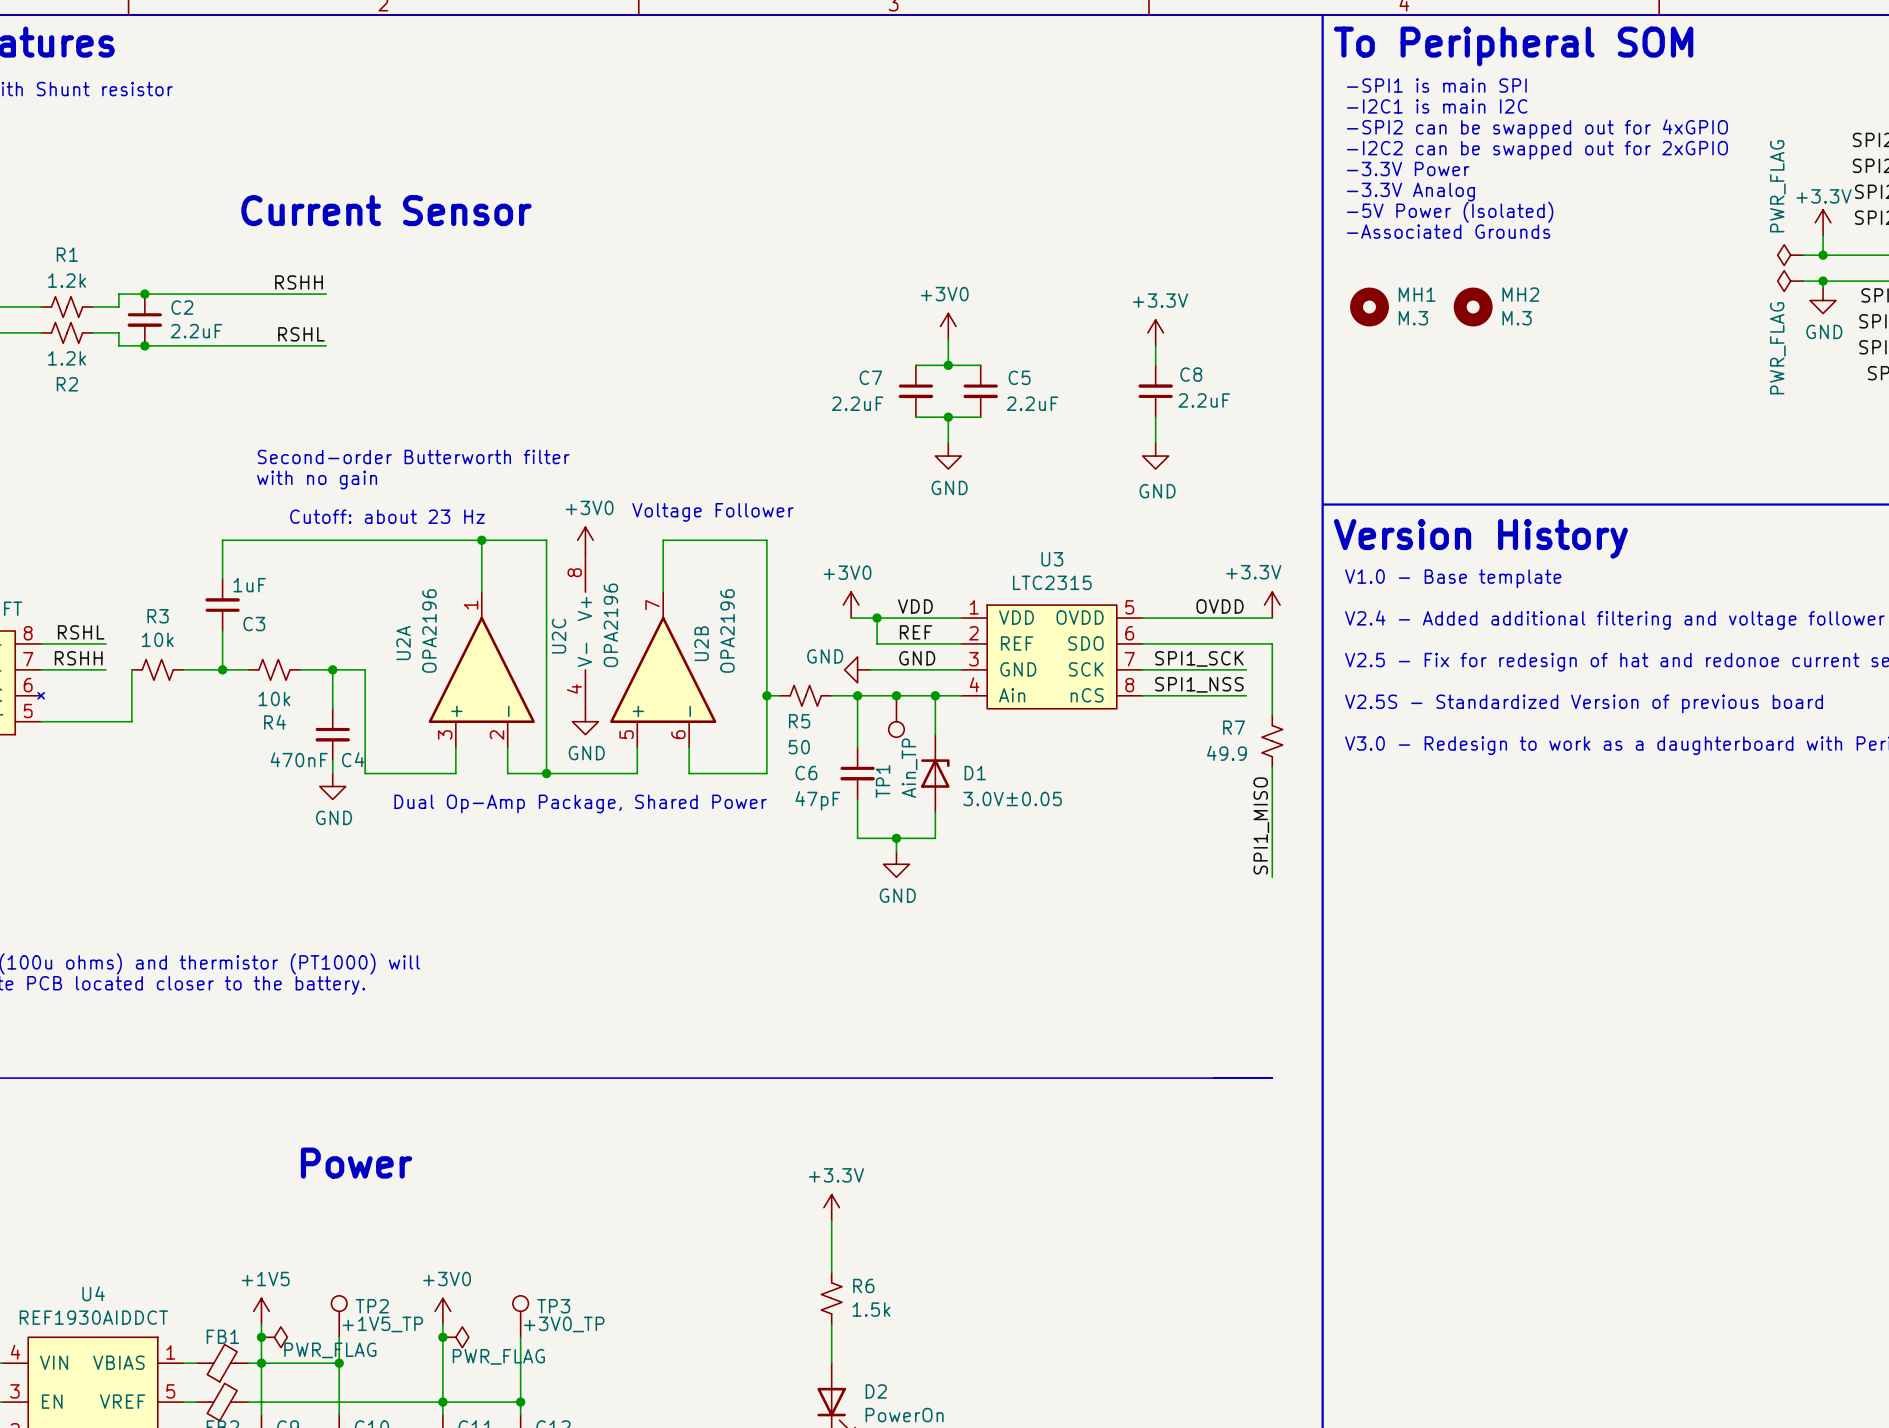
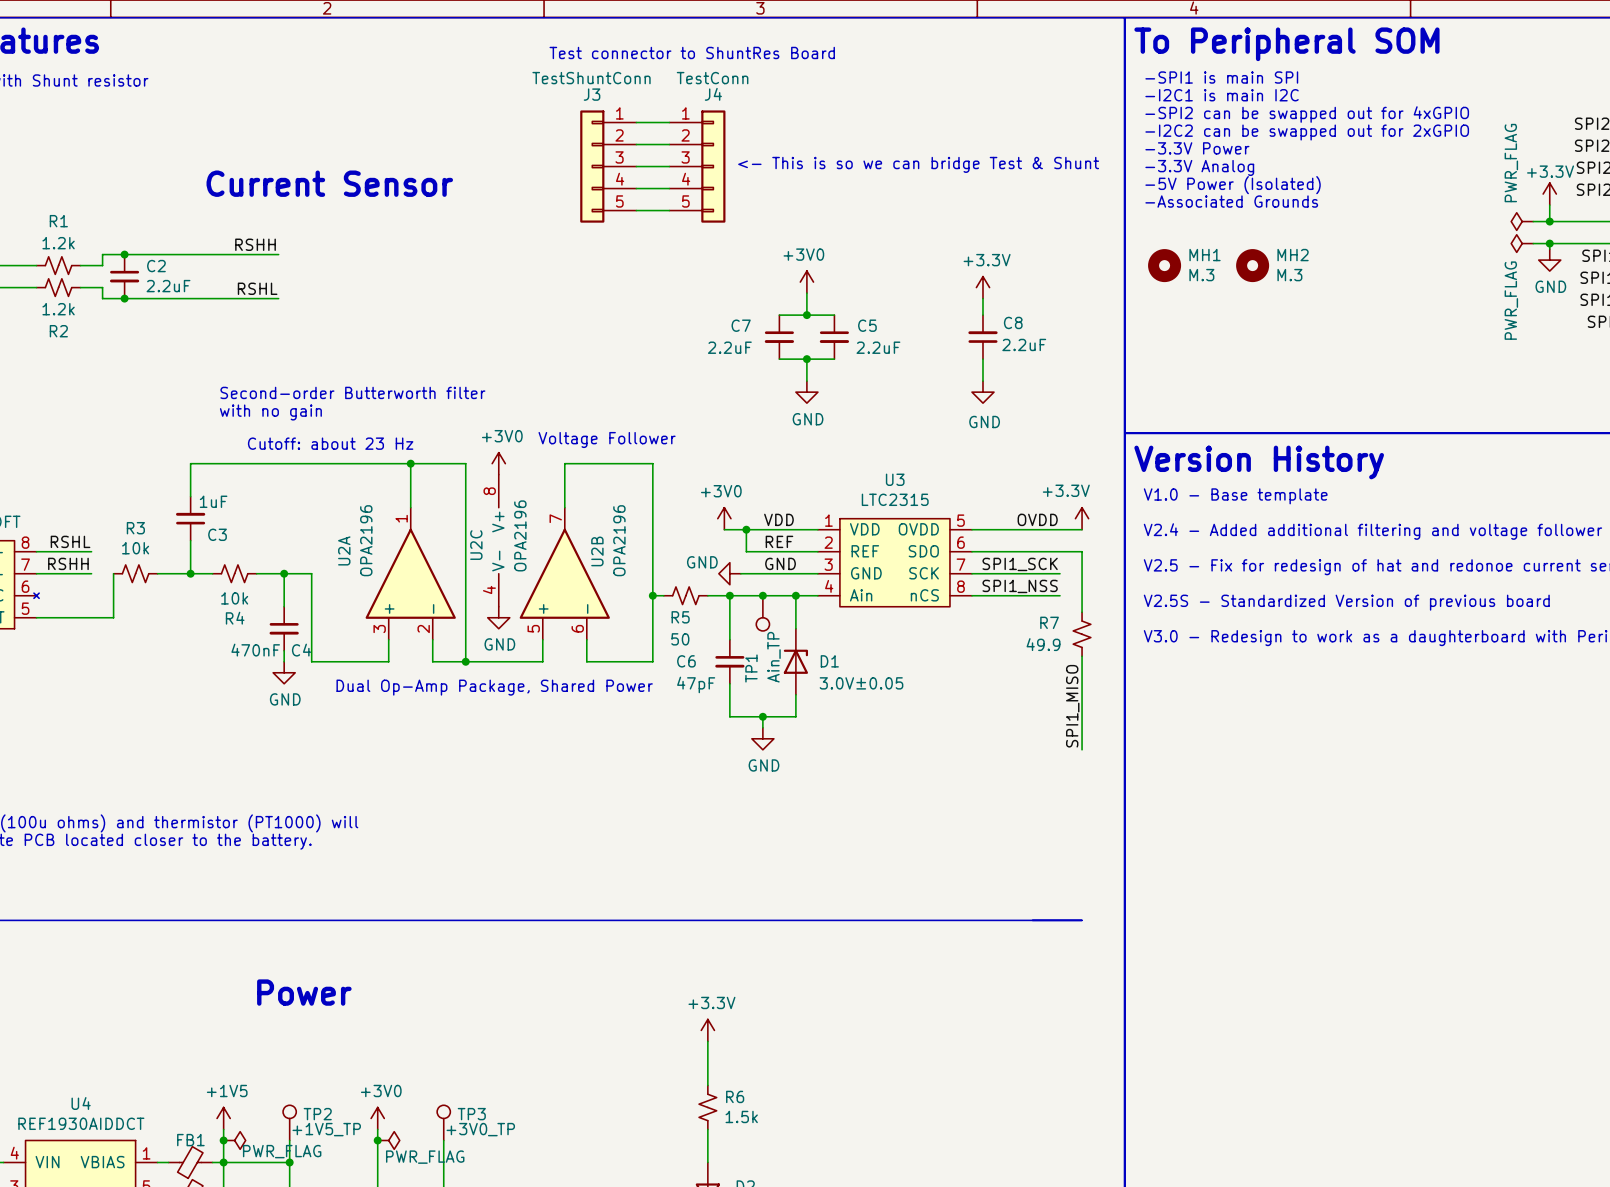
text: none -> Test connector to ShuntRes Board (692, 52)
wire: none -> (636, 122) (669, 122)
wire: none -> (636, 144) (669, 144)
text: none -> <- This is so we can bridge Test & Shunt (918, 164)
J3: none -> TestShuntConn (608, 166)
wire: none -> (636, 166) (669, 166)
J4: none -> TestConn (697, 166)
wire: none -> (636, 188) (669, 188)
wire: none -> (636, 210) (669, 210)

